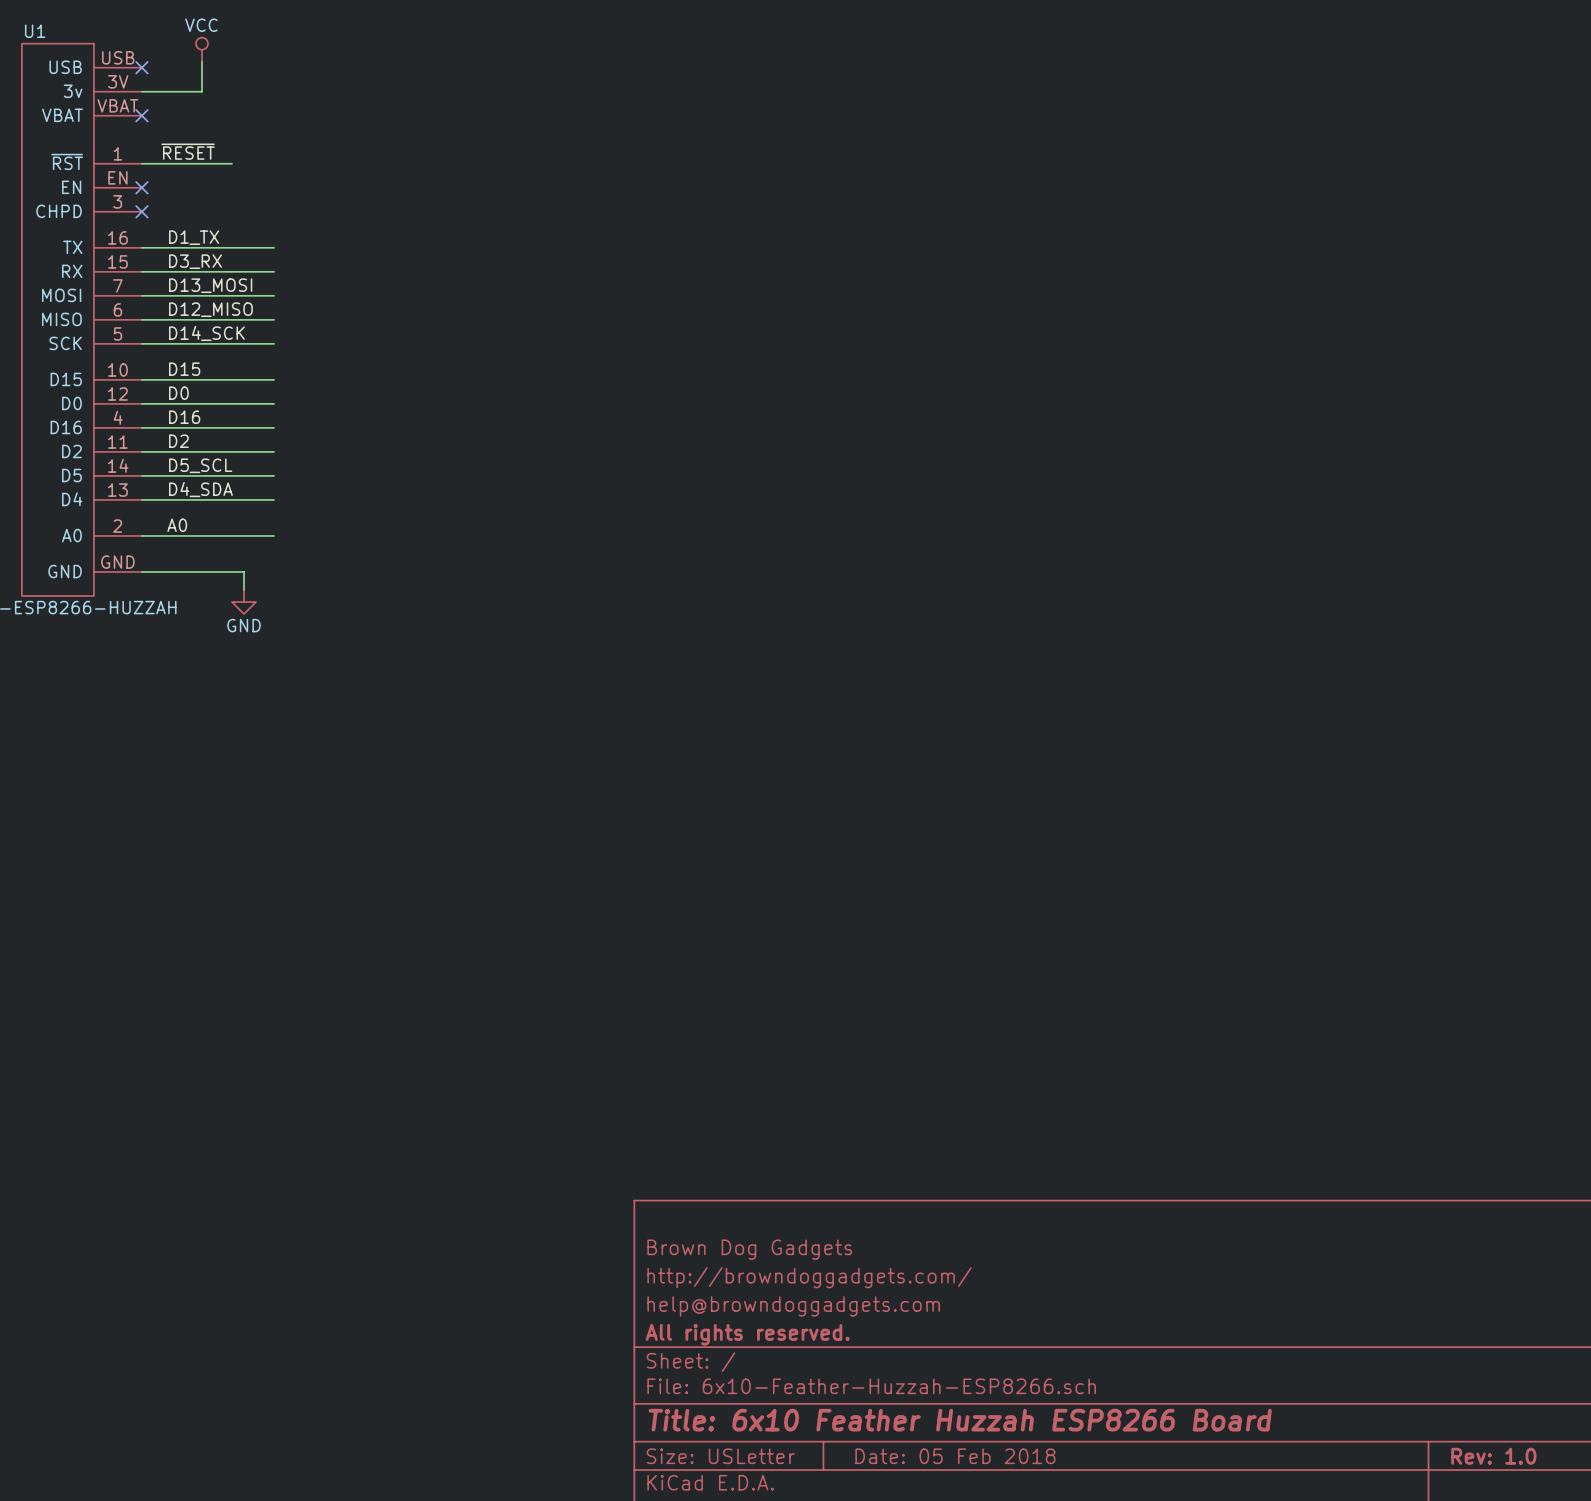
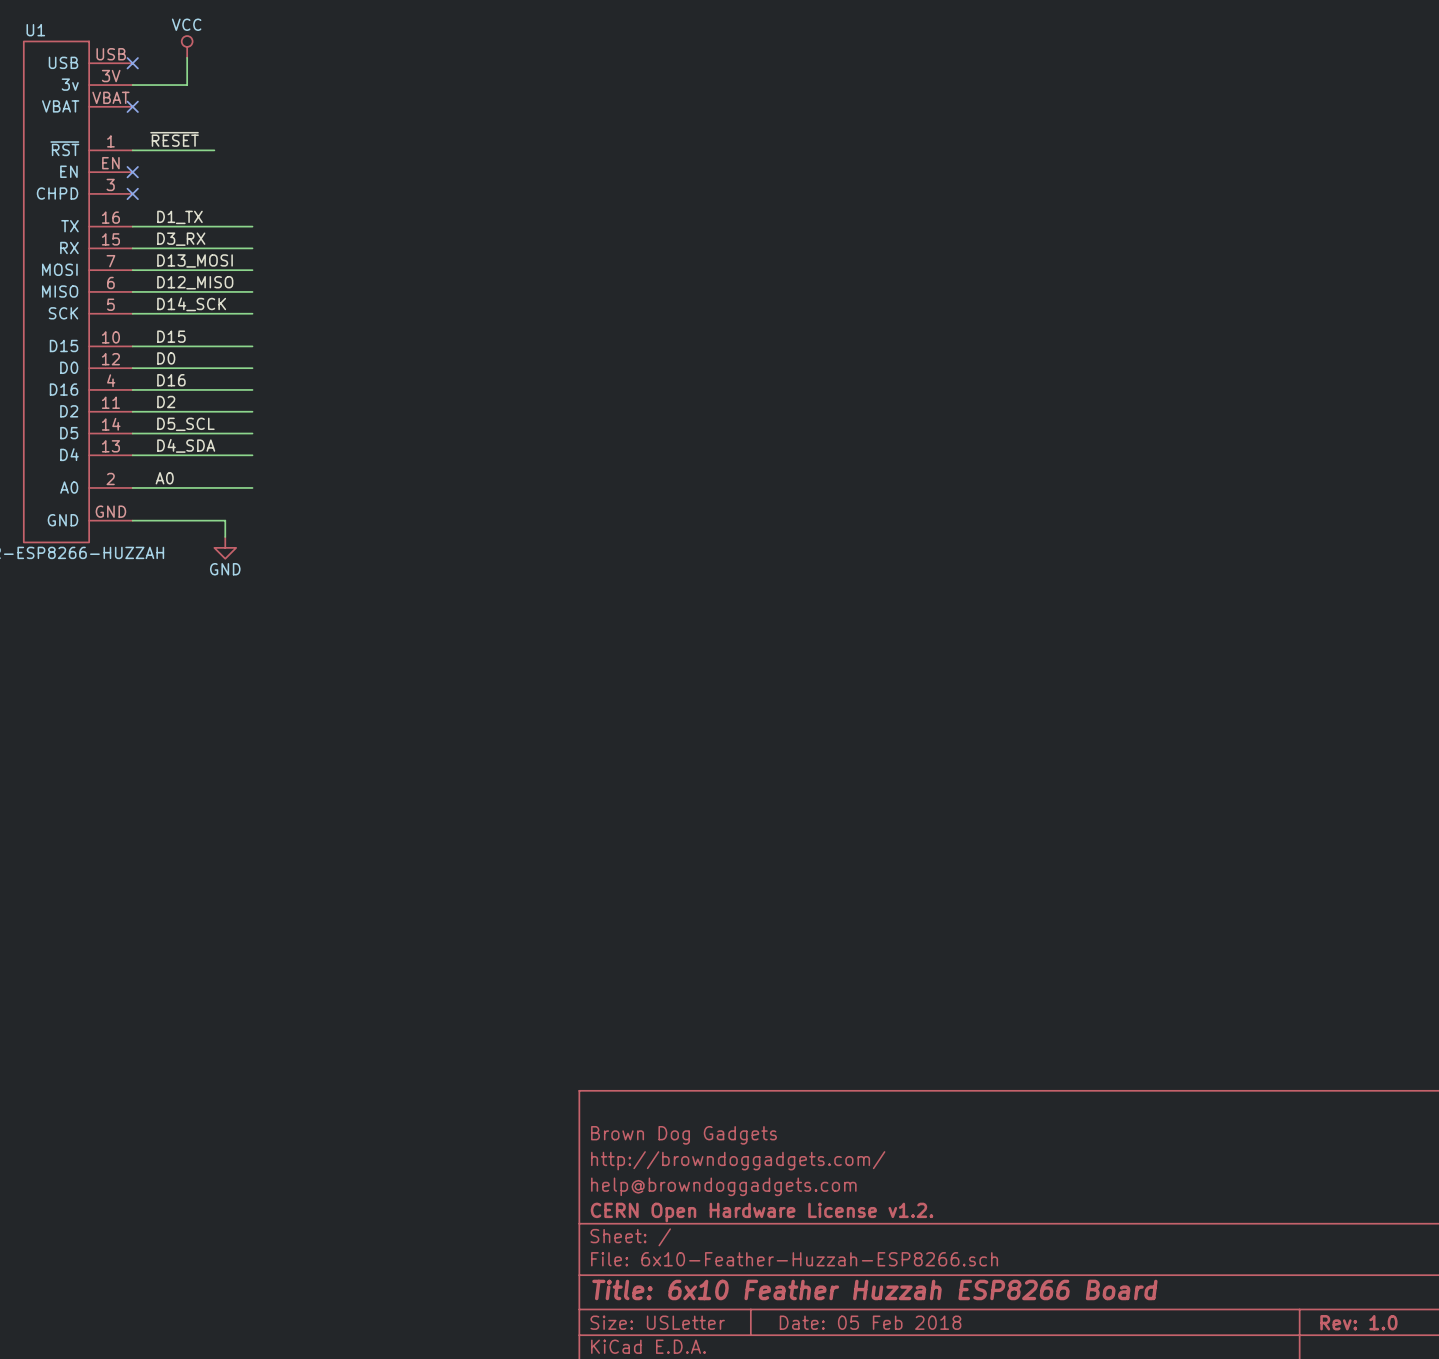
title block: All rights reserved. (747, 1334) -> CERN Open Hardware License v1.2. (762, 1212)

